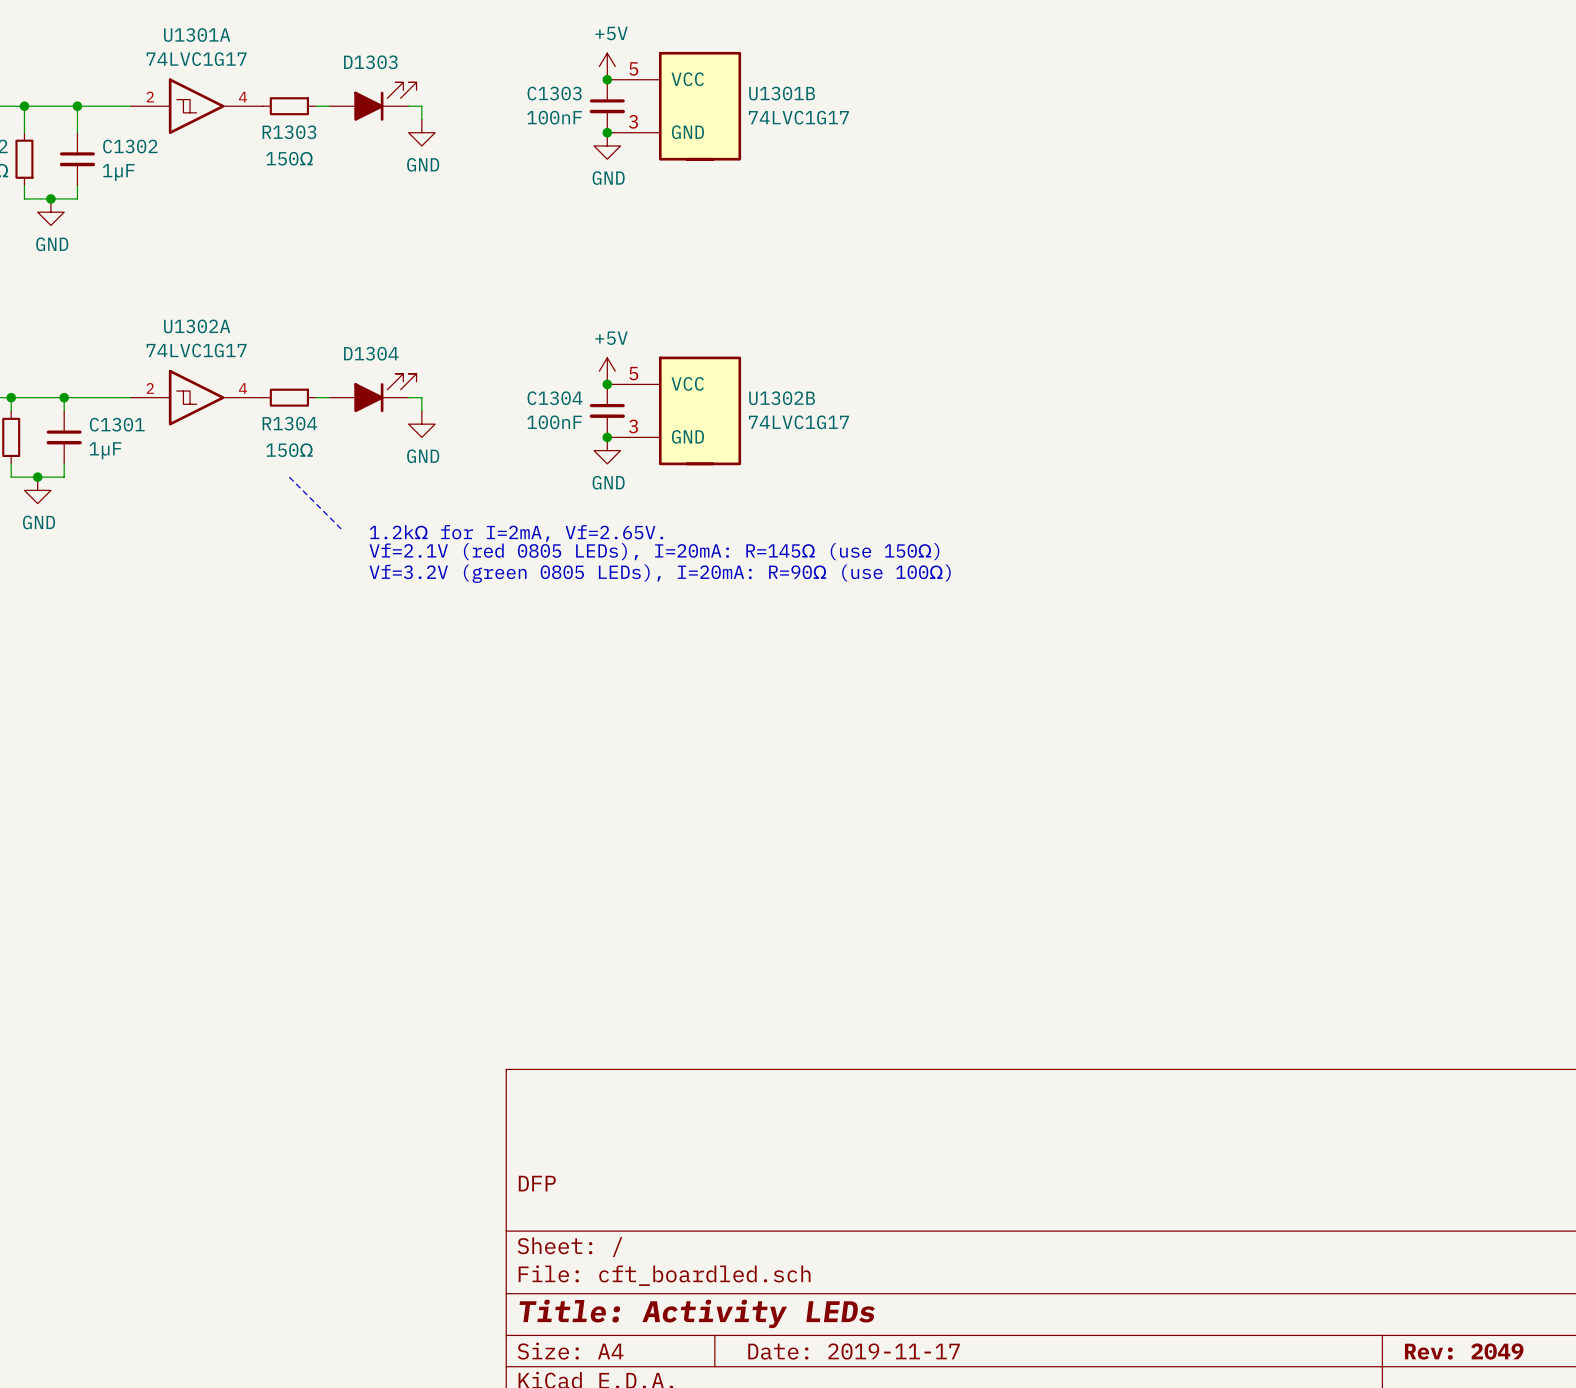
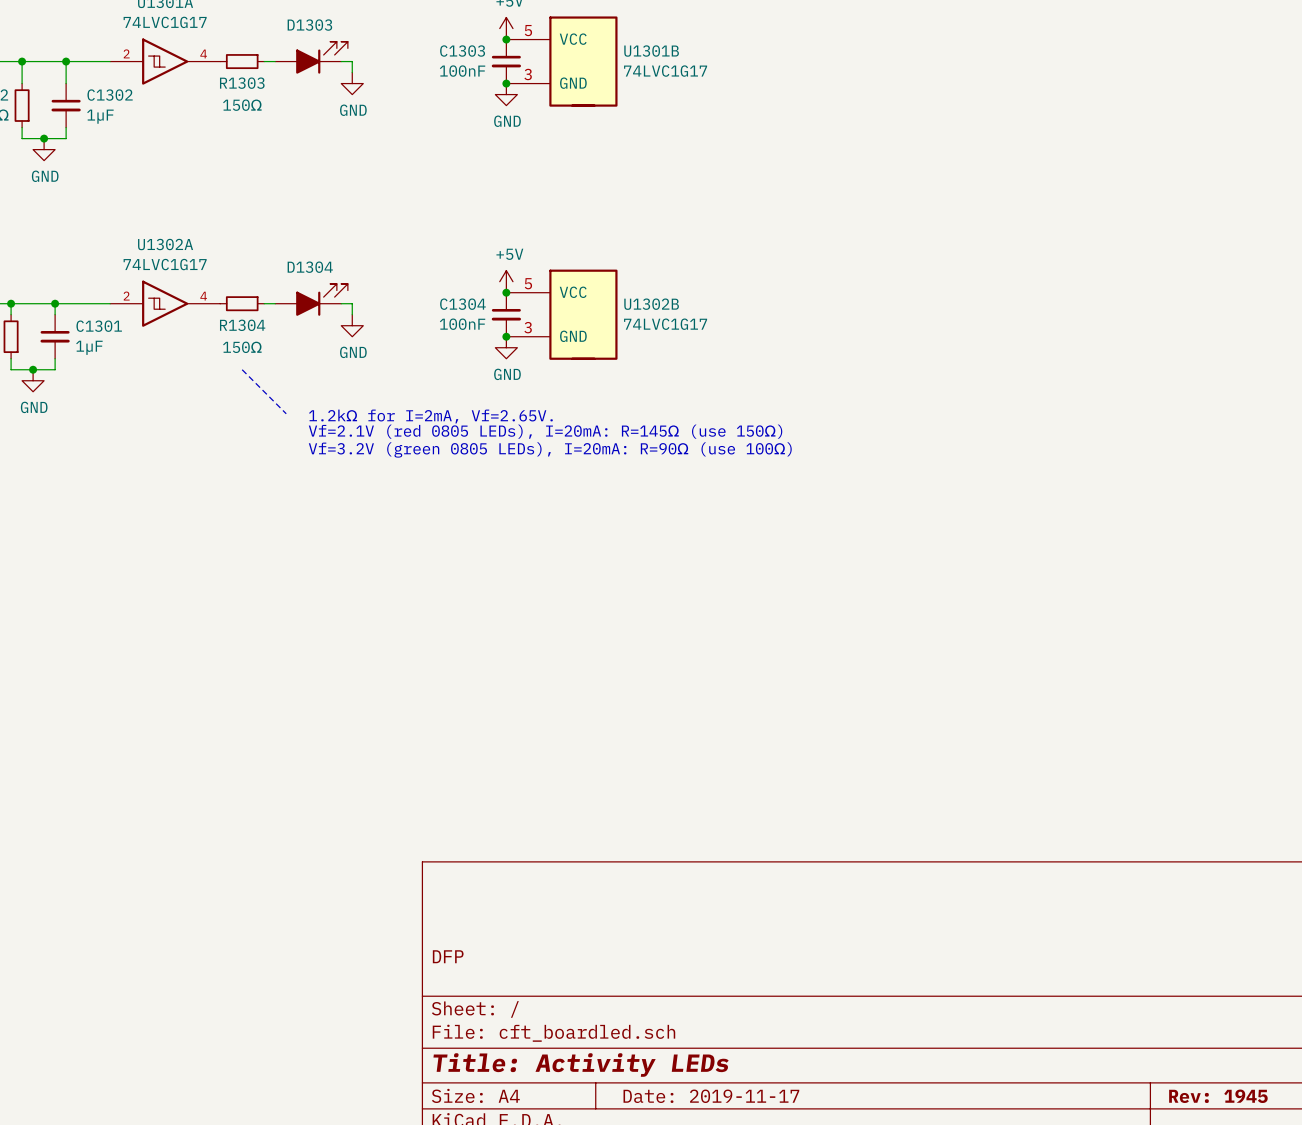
title block: Rev: 2049 (1464, 1351) -> Rev: 1945 (1218, 1096)

